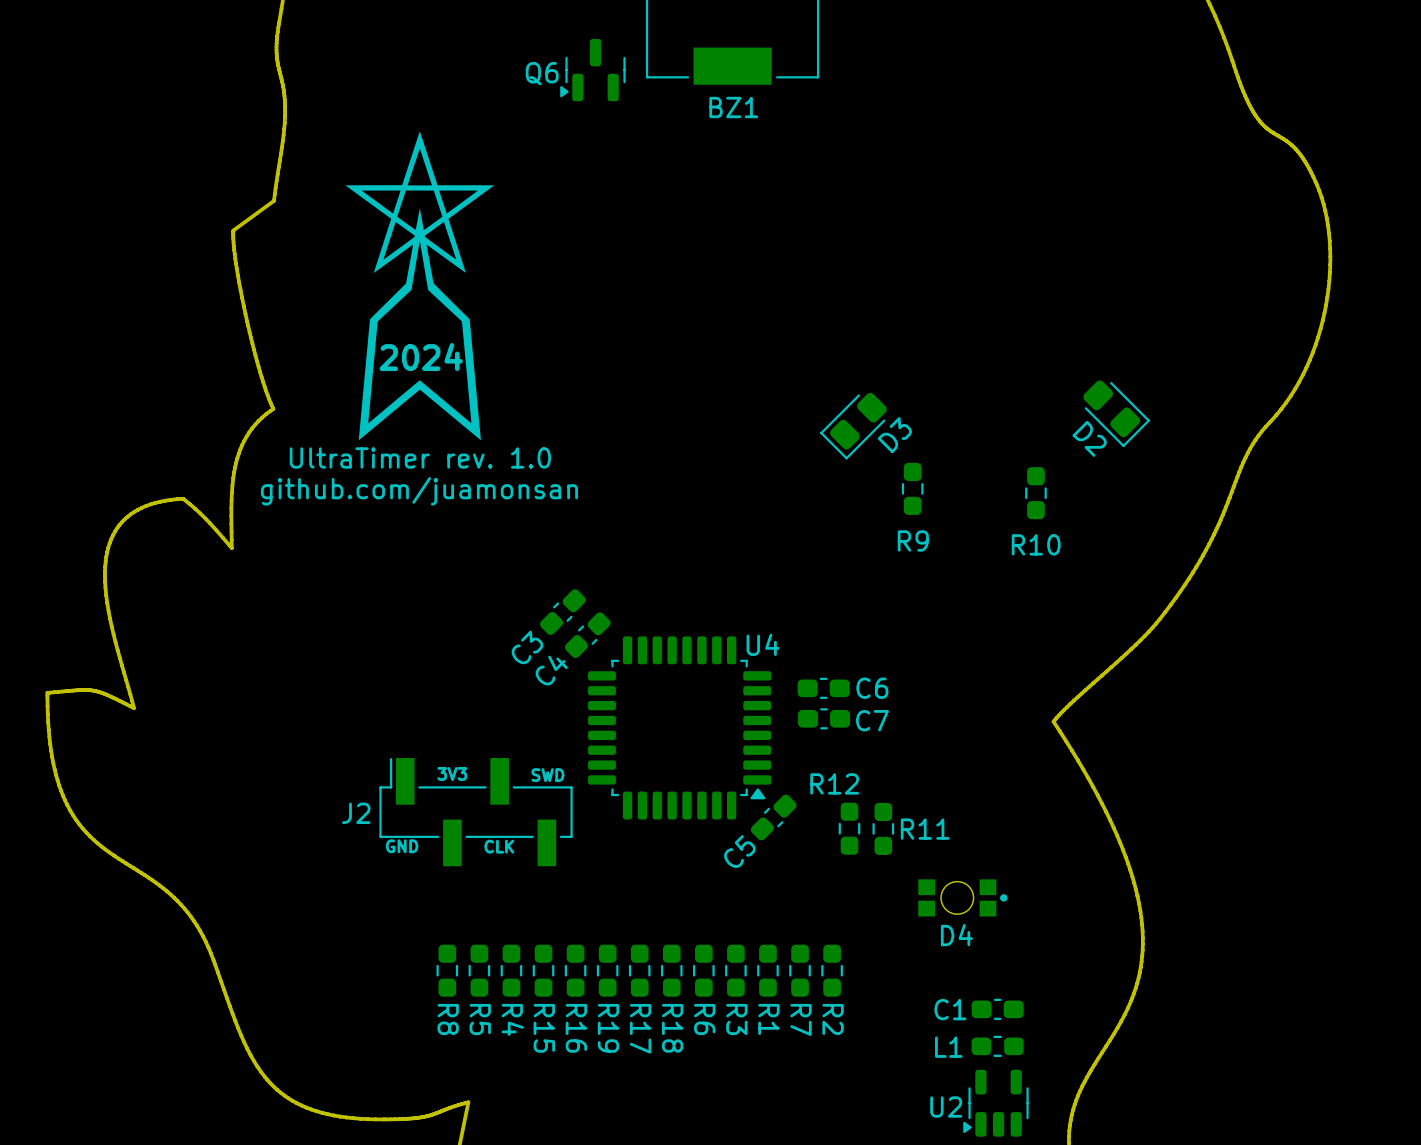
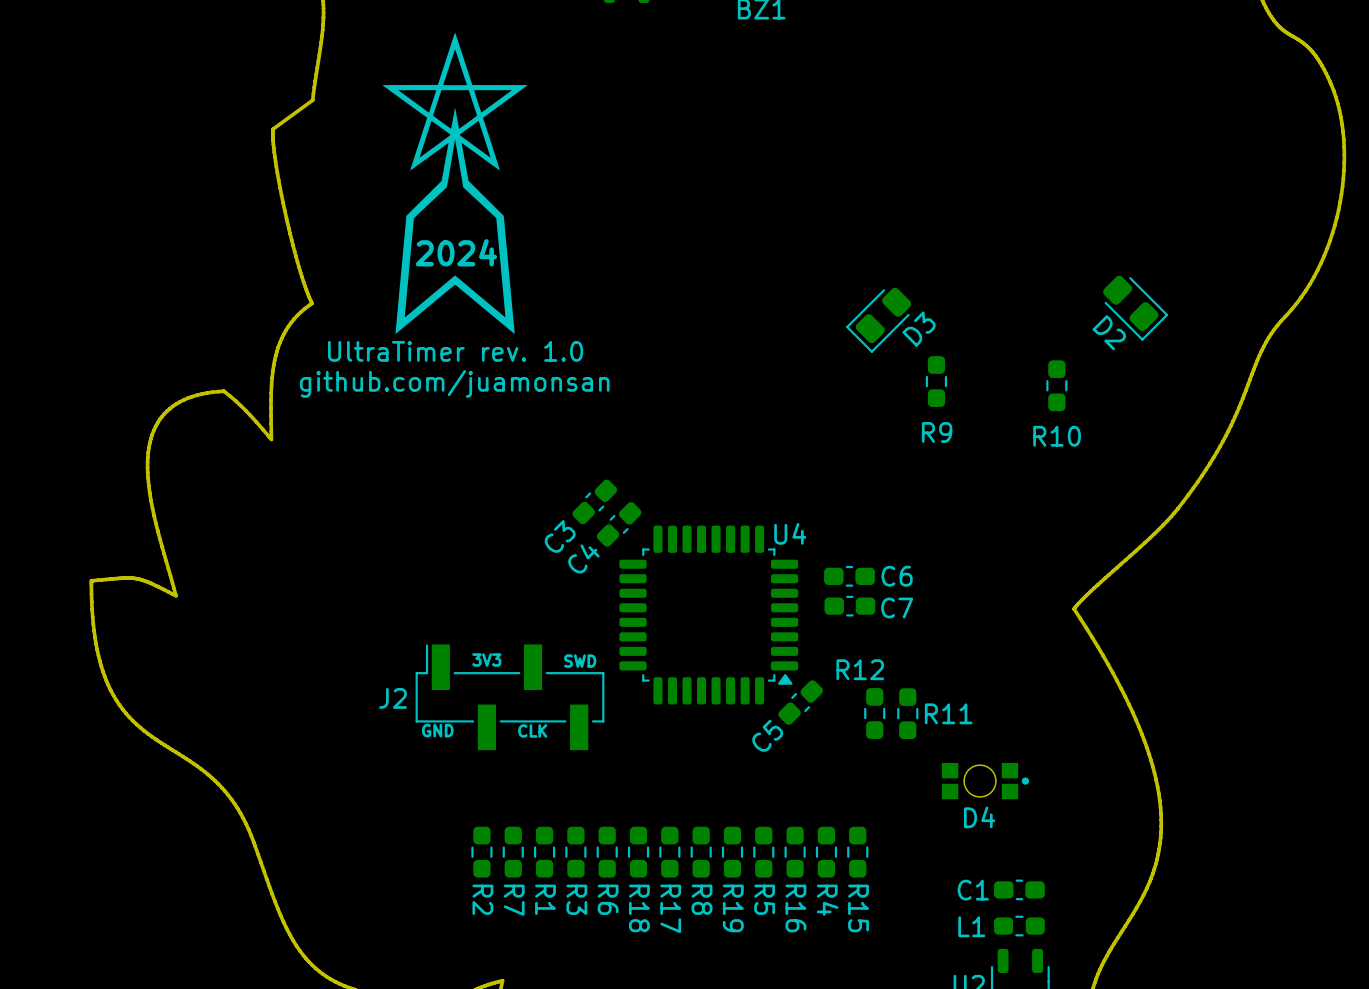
R8 name: R8 (448, 1019) -> R2 (482, 899)
R5 name: R5 (480, 1019) -> R7 (514, 900)
R4 name: R4 (512, 1019) -> R1 (545, 899)
R6 name: R6 (704, 1019) -> R19 (733, 908)
R3 name: R3 (736, 1019) -> R5 (764, 899)
R1 name: R1 (768, 1019) -> R16 (795, 908)
R7 name: R7 (800, 1019) -> R4 (827, 900)
R2 name: R2 (833, 1019) -> R15 (858, 908)
R15 name: R15 (544, 1028) -> R3 (576, 899)
R16 name: R16 (576, 1028) -> R6 (608, 899)
R19 name: R19 (608, 1028) -> R18 (639, 908)
R18 name: R18 (672, 1028) -> R8 (702, 899)

